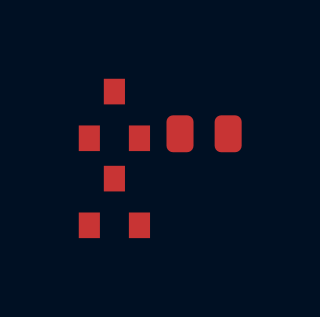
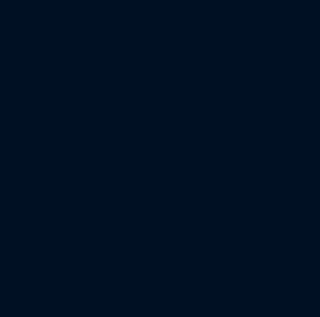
part: (114, 114) -> none
part: (204, 133) -> none
part: (114, 201) -> none

